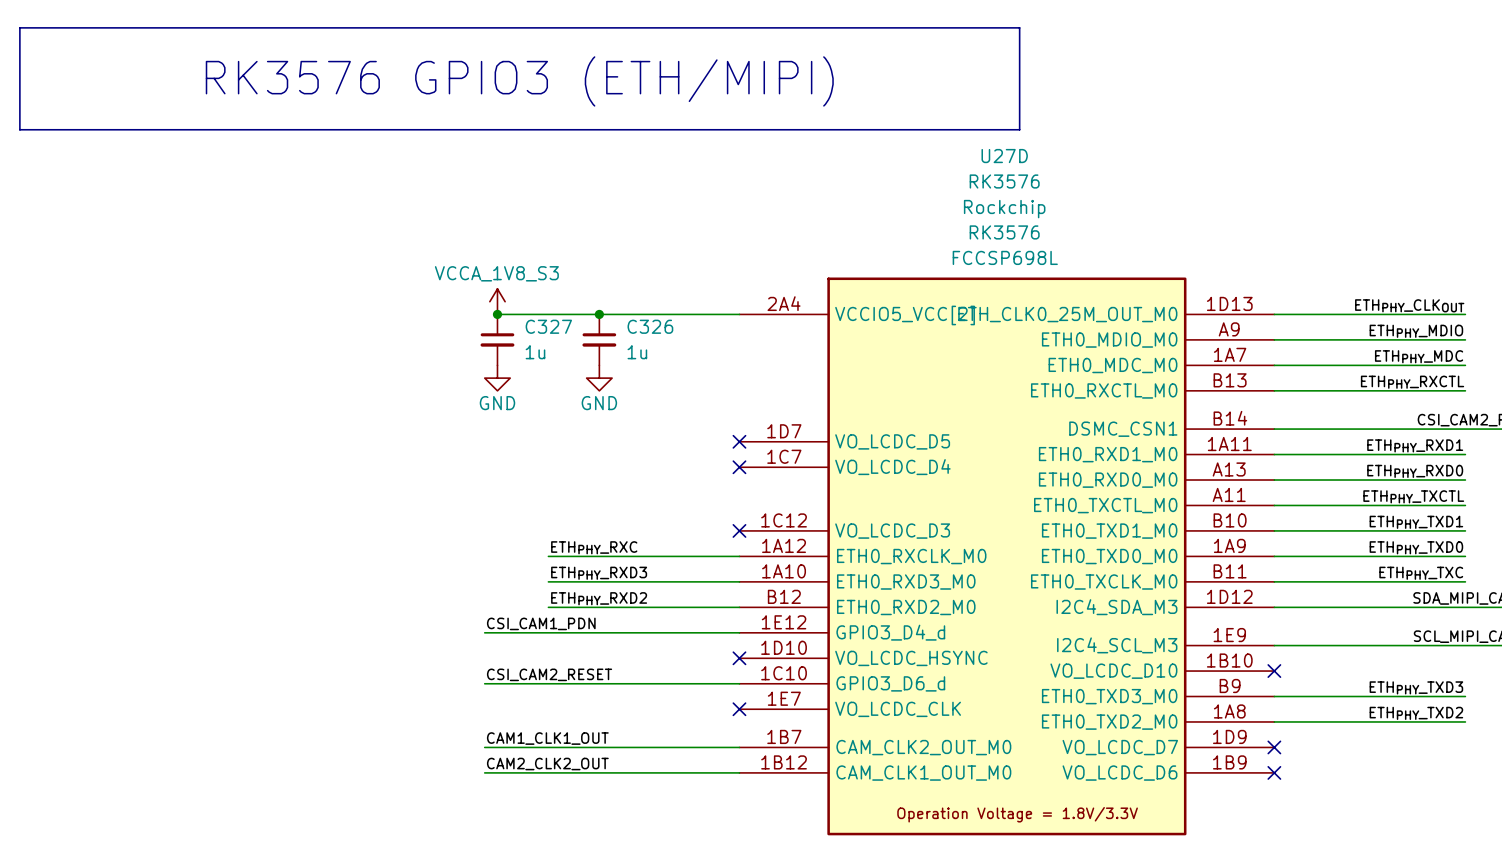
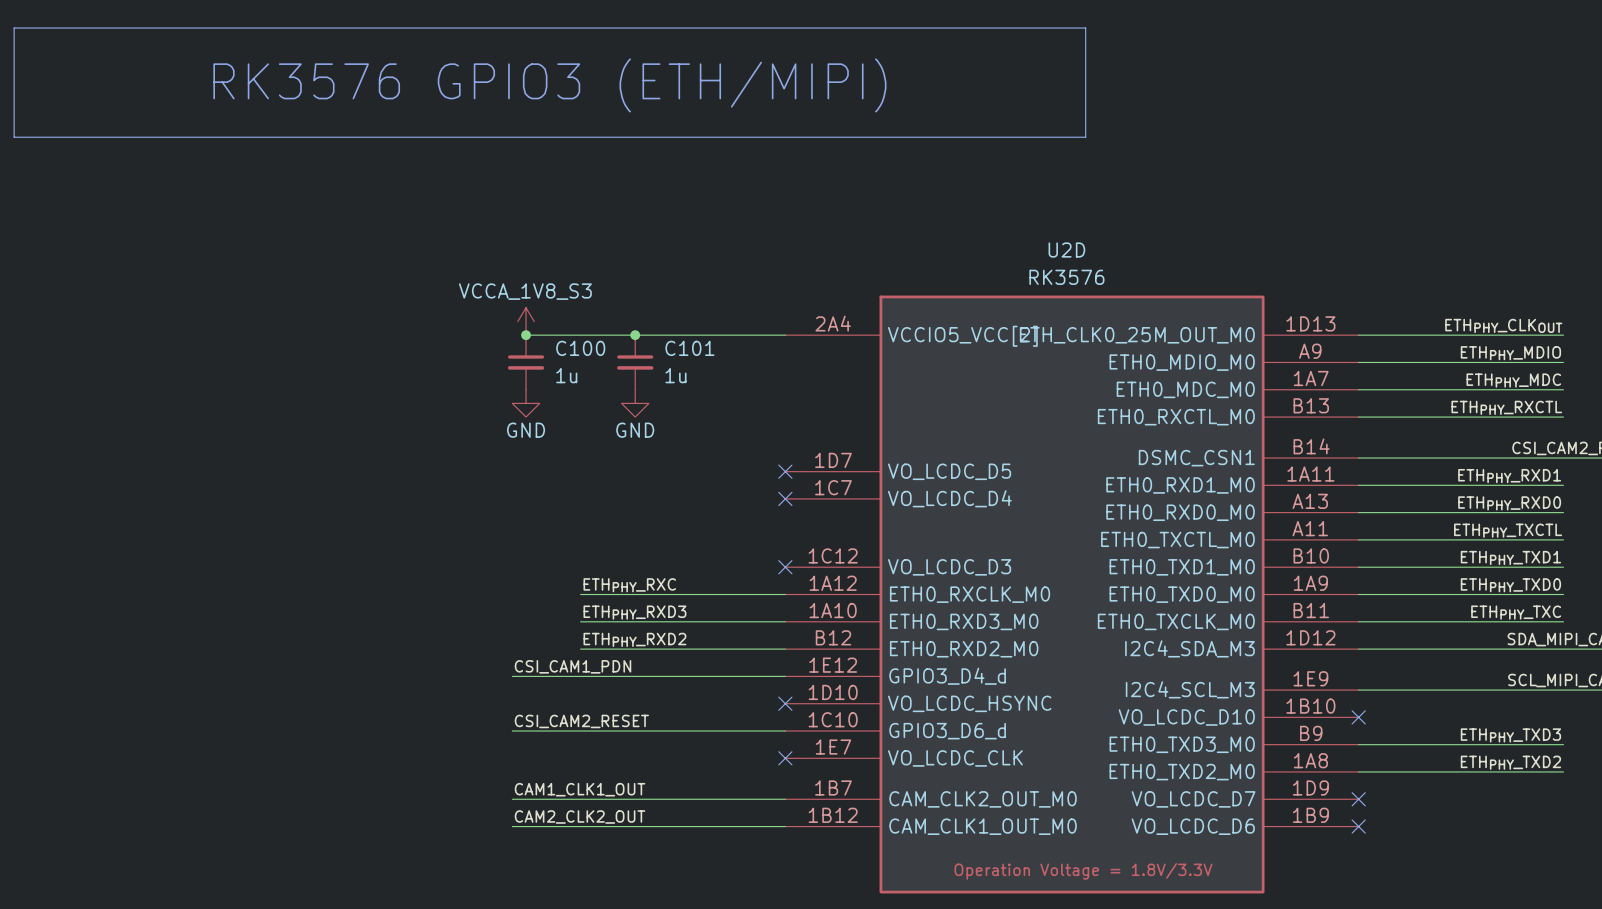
U27D name: U27D (1004, 156) -> U2D (1066, 250)
U27D value position: RK3576 (1004, 181) -> RK3576 (1066, 277)
U27D text: Rockchip (1004, 209) -> none
U27D text: RK3576 (1004, 232) -> none
U27D text: FCCSP698L (1005, 257) -> none
C327 name: C327 (548, 326) -> C100 (580, 348)
C326 name: C326 (650, 326) -> C101 (689, 348)

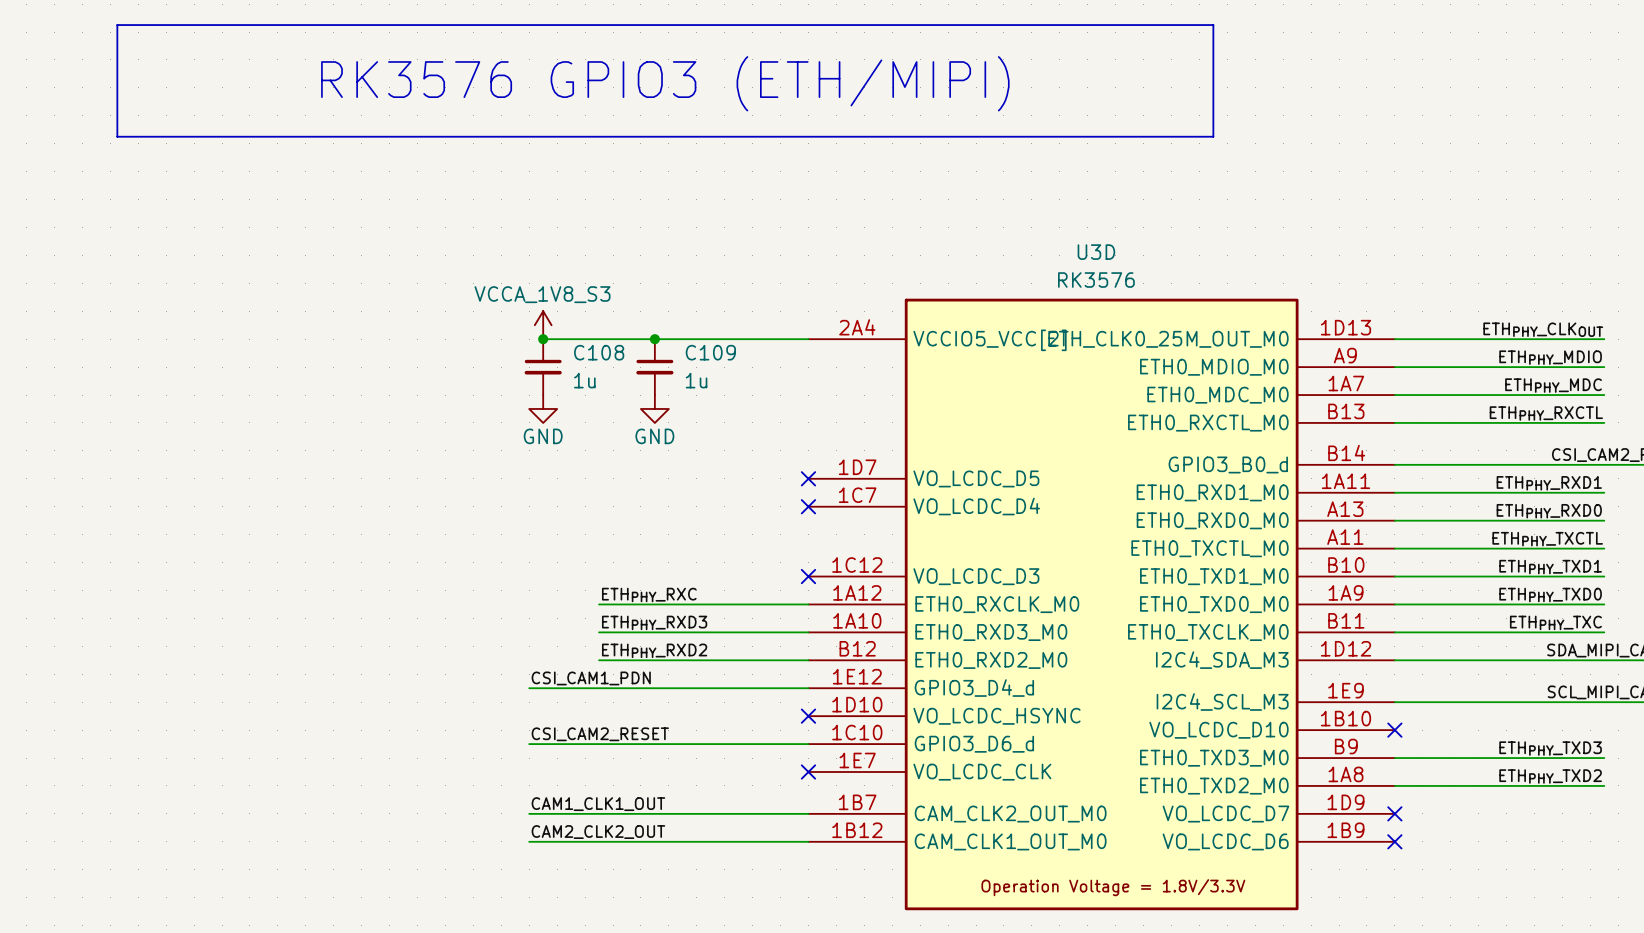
line: (109, 28) (14, 28) (14, 137) (109, 137) -> (117, 25) (117, 136)
line: (1085, 28) (1085, 137) -> (1115, 25) (1213, 25) (1213, 136) (1115, 136)
text position: RK3576 GPIO3 (ETH/MIPI) (549, 85) -> RK3576 GPIO3 (ETH/MIPI) (665, 83)
U2D name: U2D (1066, 250) -> U3D (1096, 252)
C100 name: C100 (580, 348) -> C108 (599, 352)
C101 name: C101 (689, 348) -> C109 (710, 352)
U2D pin name: DSMC_CSN1 (1196, 458) -> GPIO3_B0_d (1228, 464)

